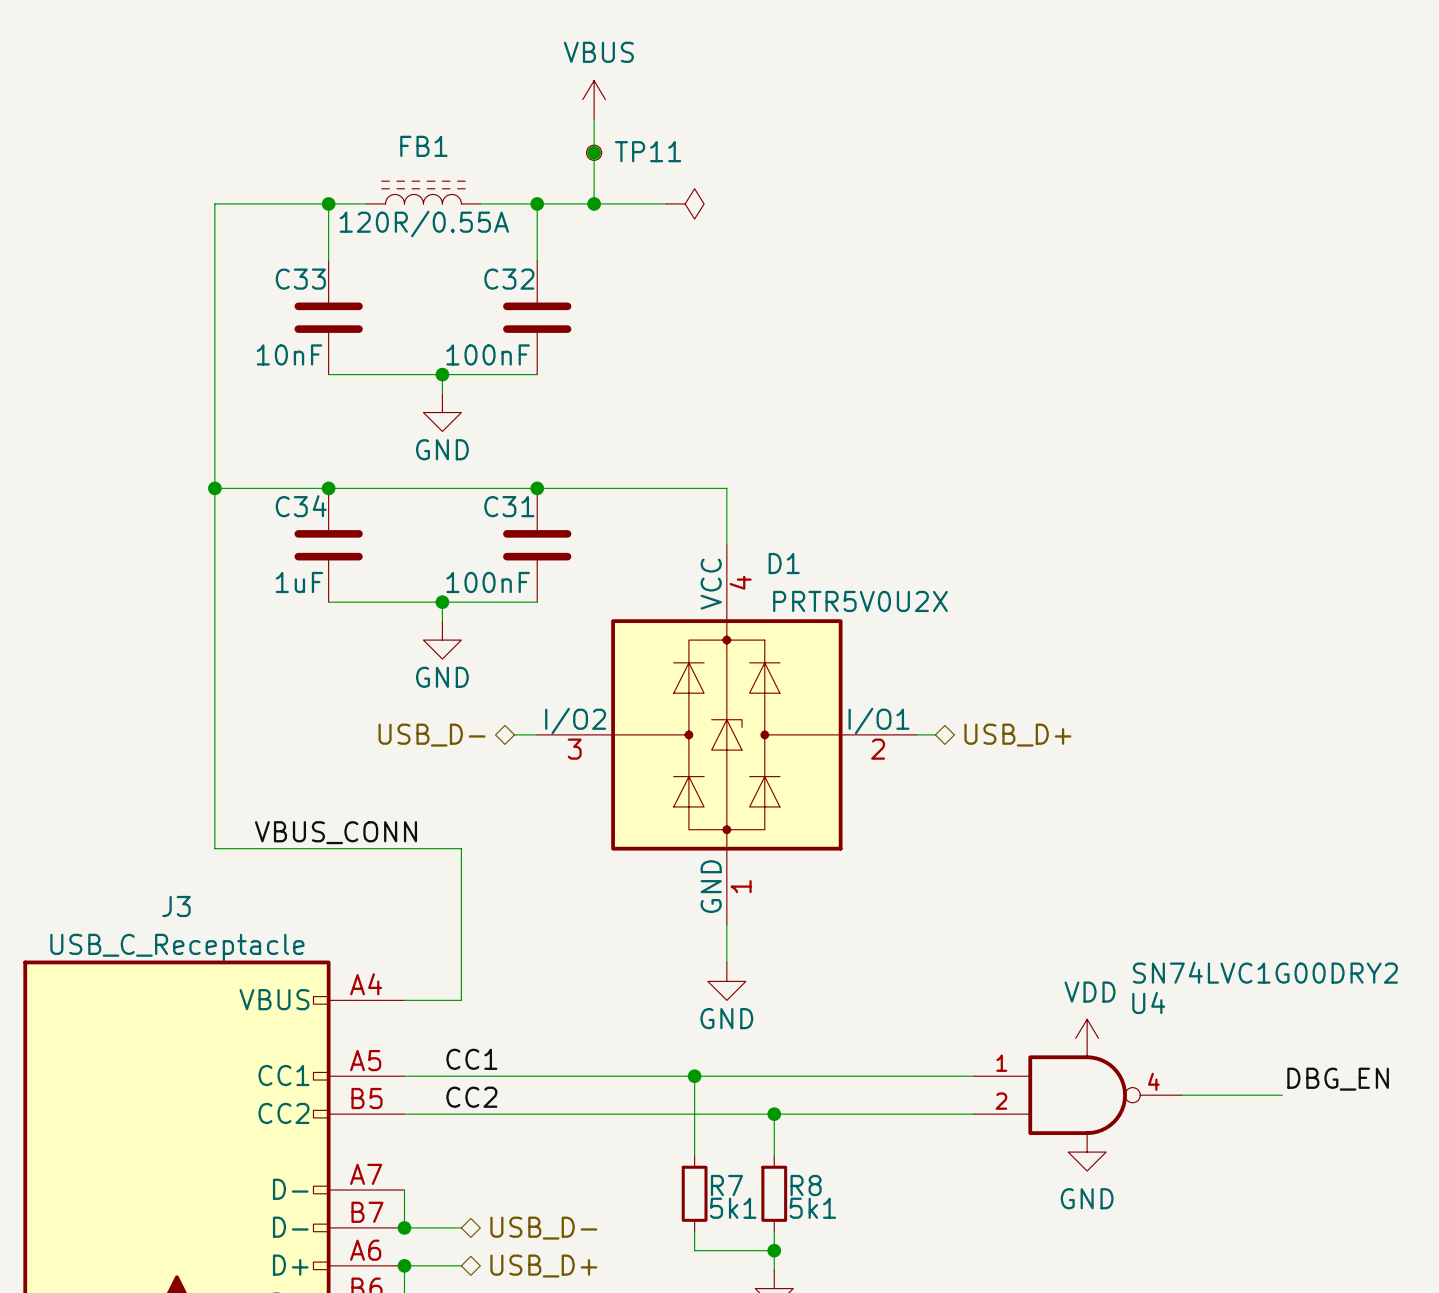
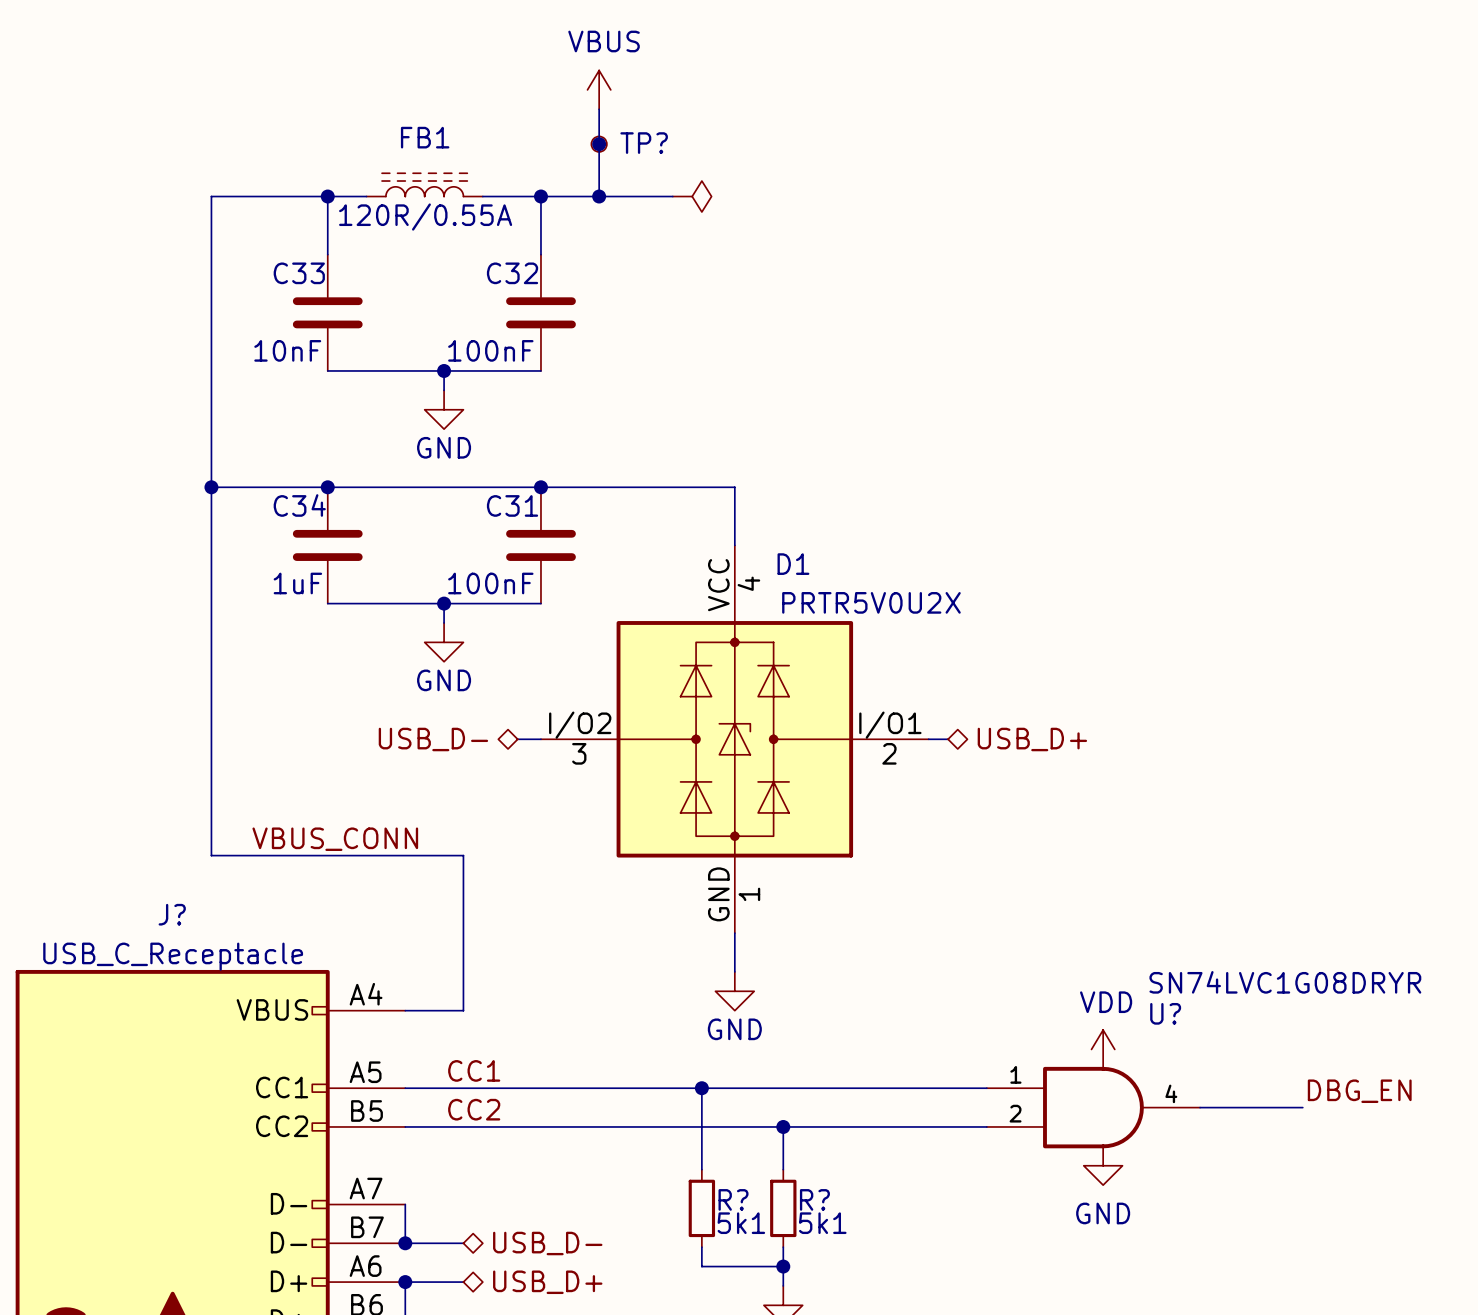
TP11 name: TP11 (648, 151) -> TP? (644, 143)
J3 name: J3 (176, 906) -> J? (172, 914)
U4: SN74LVC1G00DRY2 (1077, 1095) -> none
U?: none -> SN74LVC1G08DRYR (1093, 1107)
R7 name: R7 (726, 1185) -> R? (733, 1199)
R8 name: R8 (806, 1185) -> R? (814, 1199)

